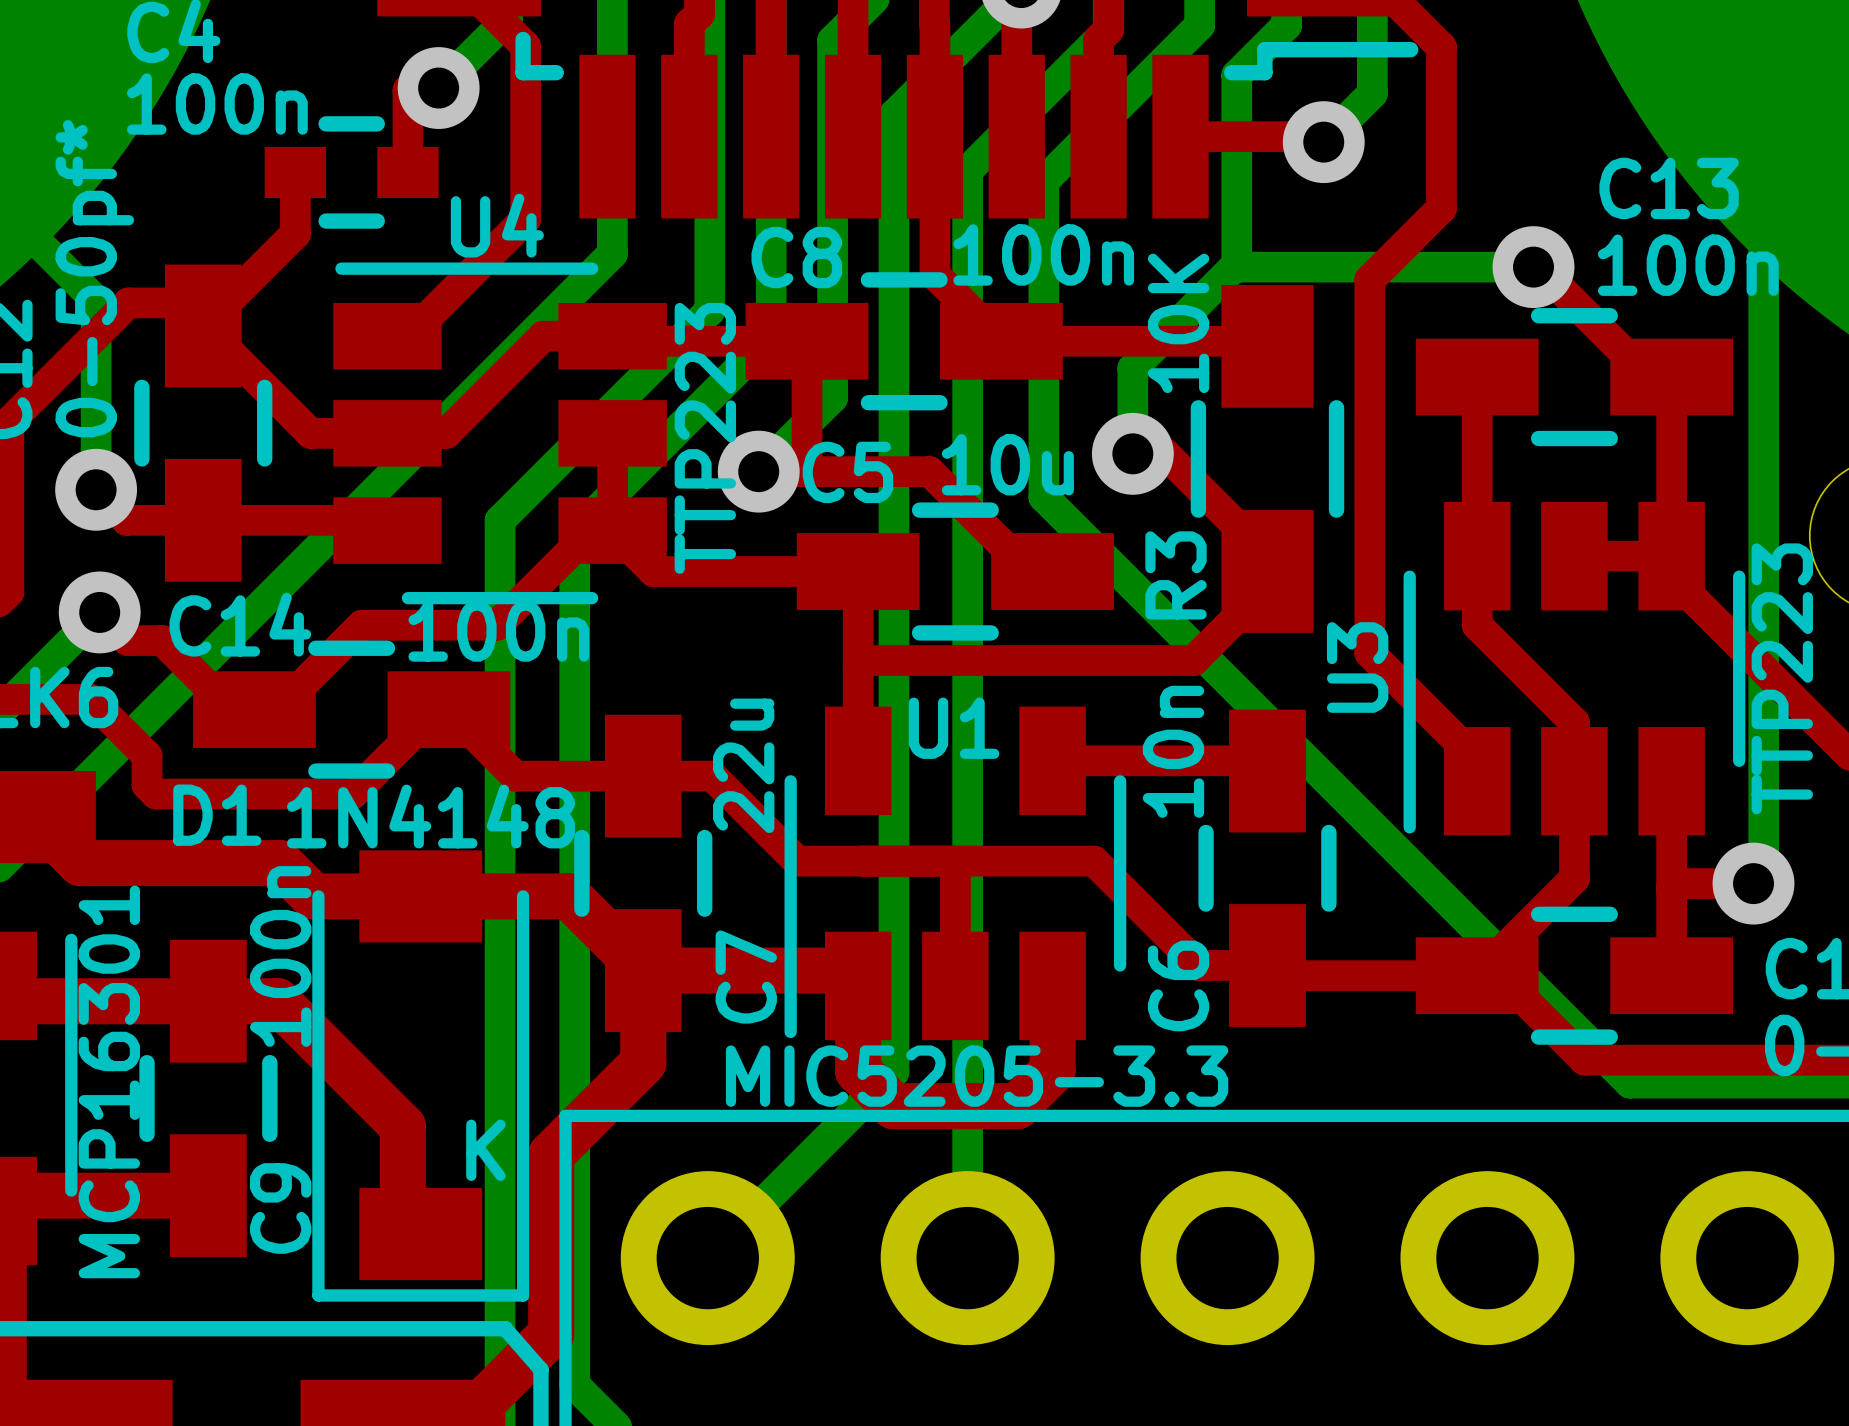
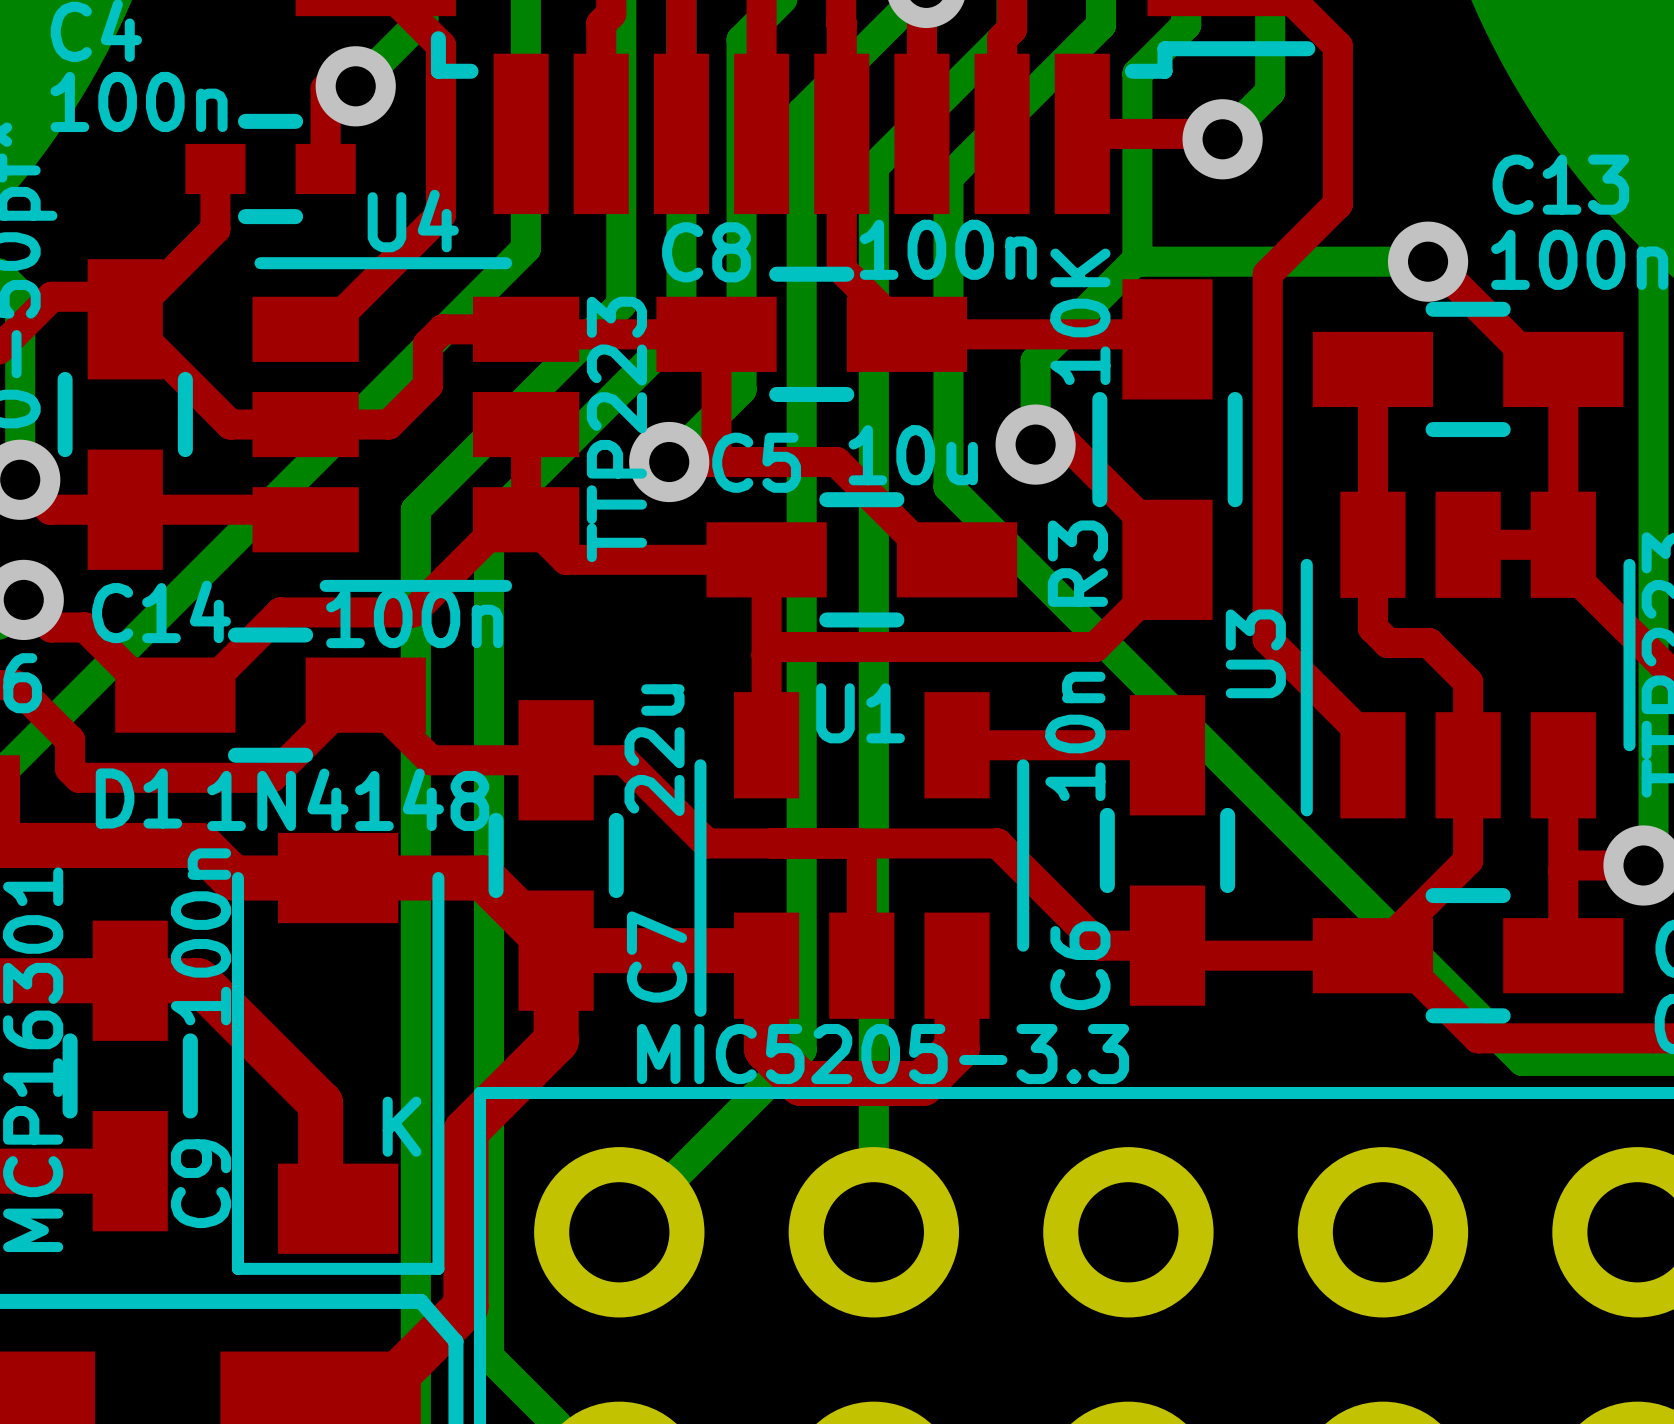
top track: (543, 336) (446, 433) -> (458, 329) (442, 329) (427, 344) (427, 385) (388, 424) (363, 424)
top track: (1477, 625) (1574, 722) -> (1372, 612) (1372, 627) (1387, 643) (1429, 643) (1468, 682) (1468, 707)

